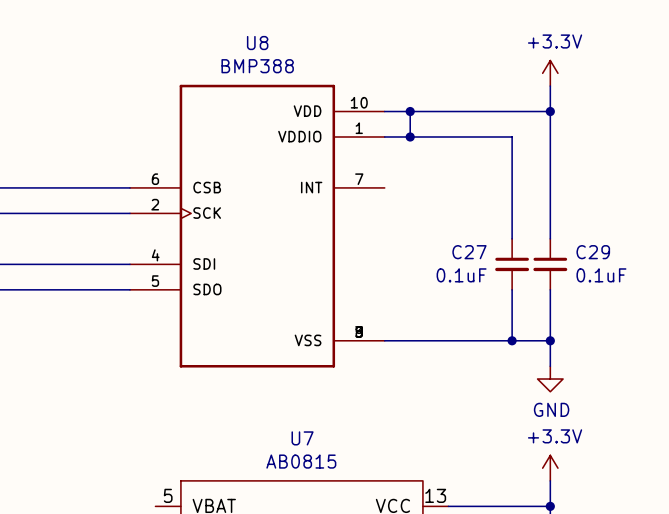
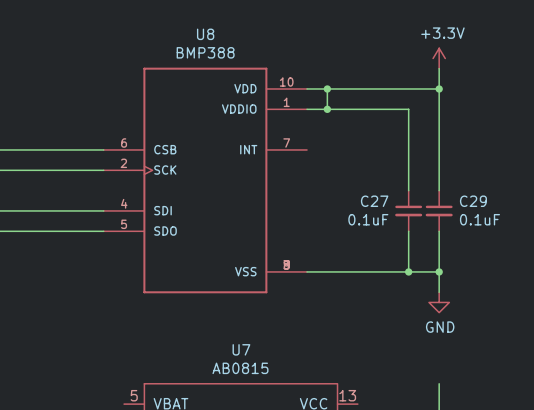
power symbol: +3.3V (550, 468) -> none
wire: (448, 506) (550, 506) -> none
junction: (550, 506) -> none

